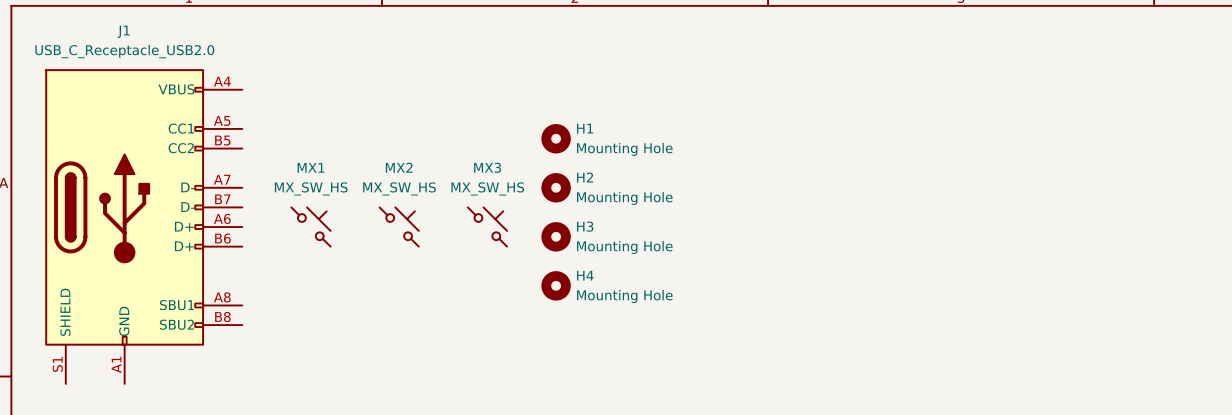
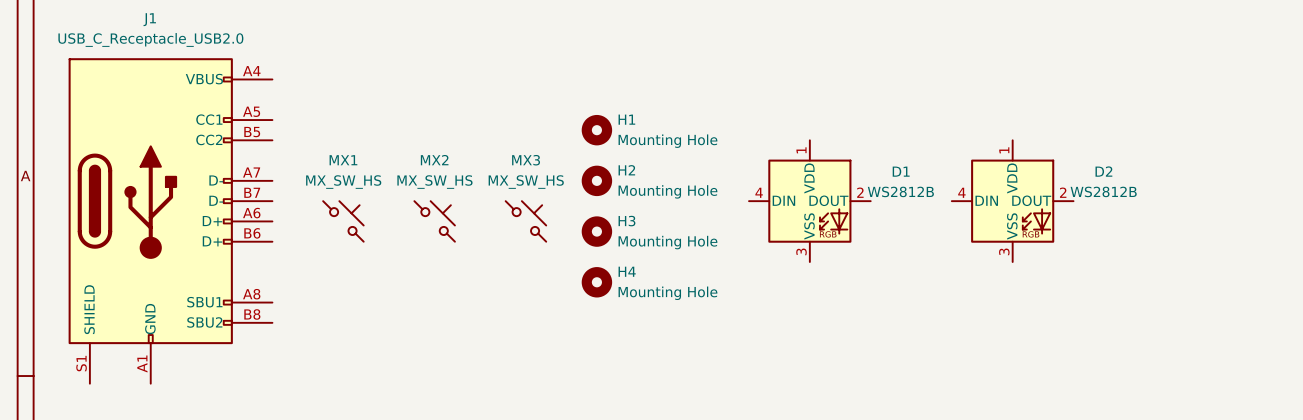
D1: none -> WS2812B (809, 201)
D2: none -> WS2812B (1012, 201)

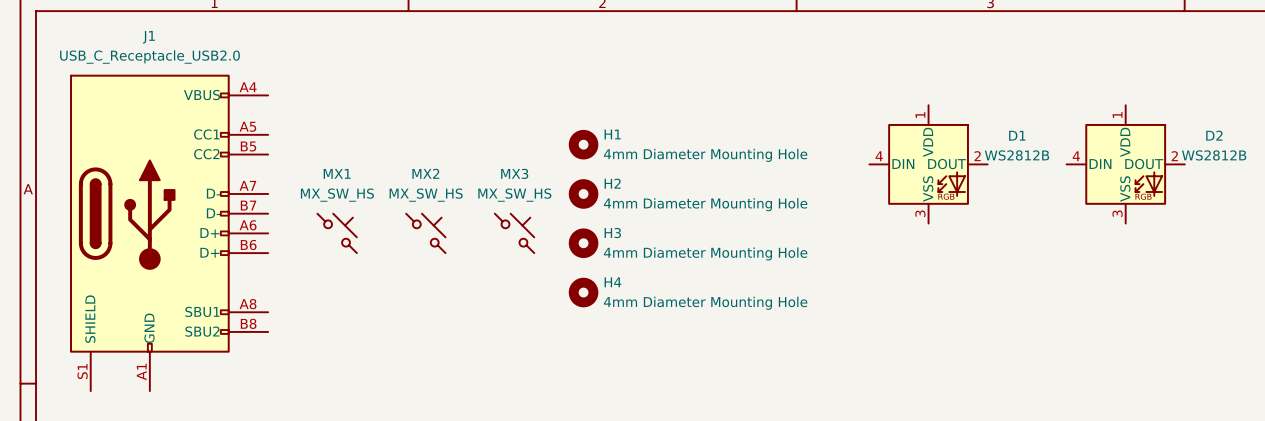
H1 value: Mounting Hole (667, 141) -> 4mm Diameter Mounting Hole (705, 155)
H2 value: Mounting Hole (667, 191) -> 4mm Diameter Mounting Hole (705, 204)
D1 position: (809, 201) -> (928, 164)
D2 position: (1012, 201) -> (1125, 164)
H3 value: Mounting Hole (667, 242) -> 4mm Diameter Mounting Hole (705, 253)
H4 value: Mounting Hole (667, 293) -> 4mm Diameter Mounting Hole (705, 303)

